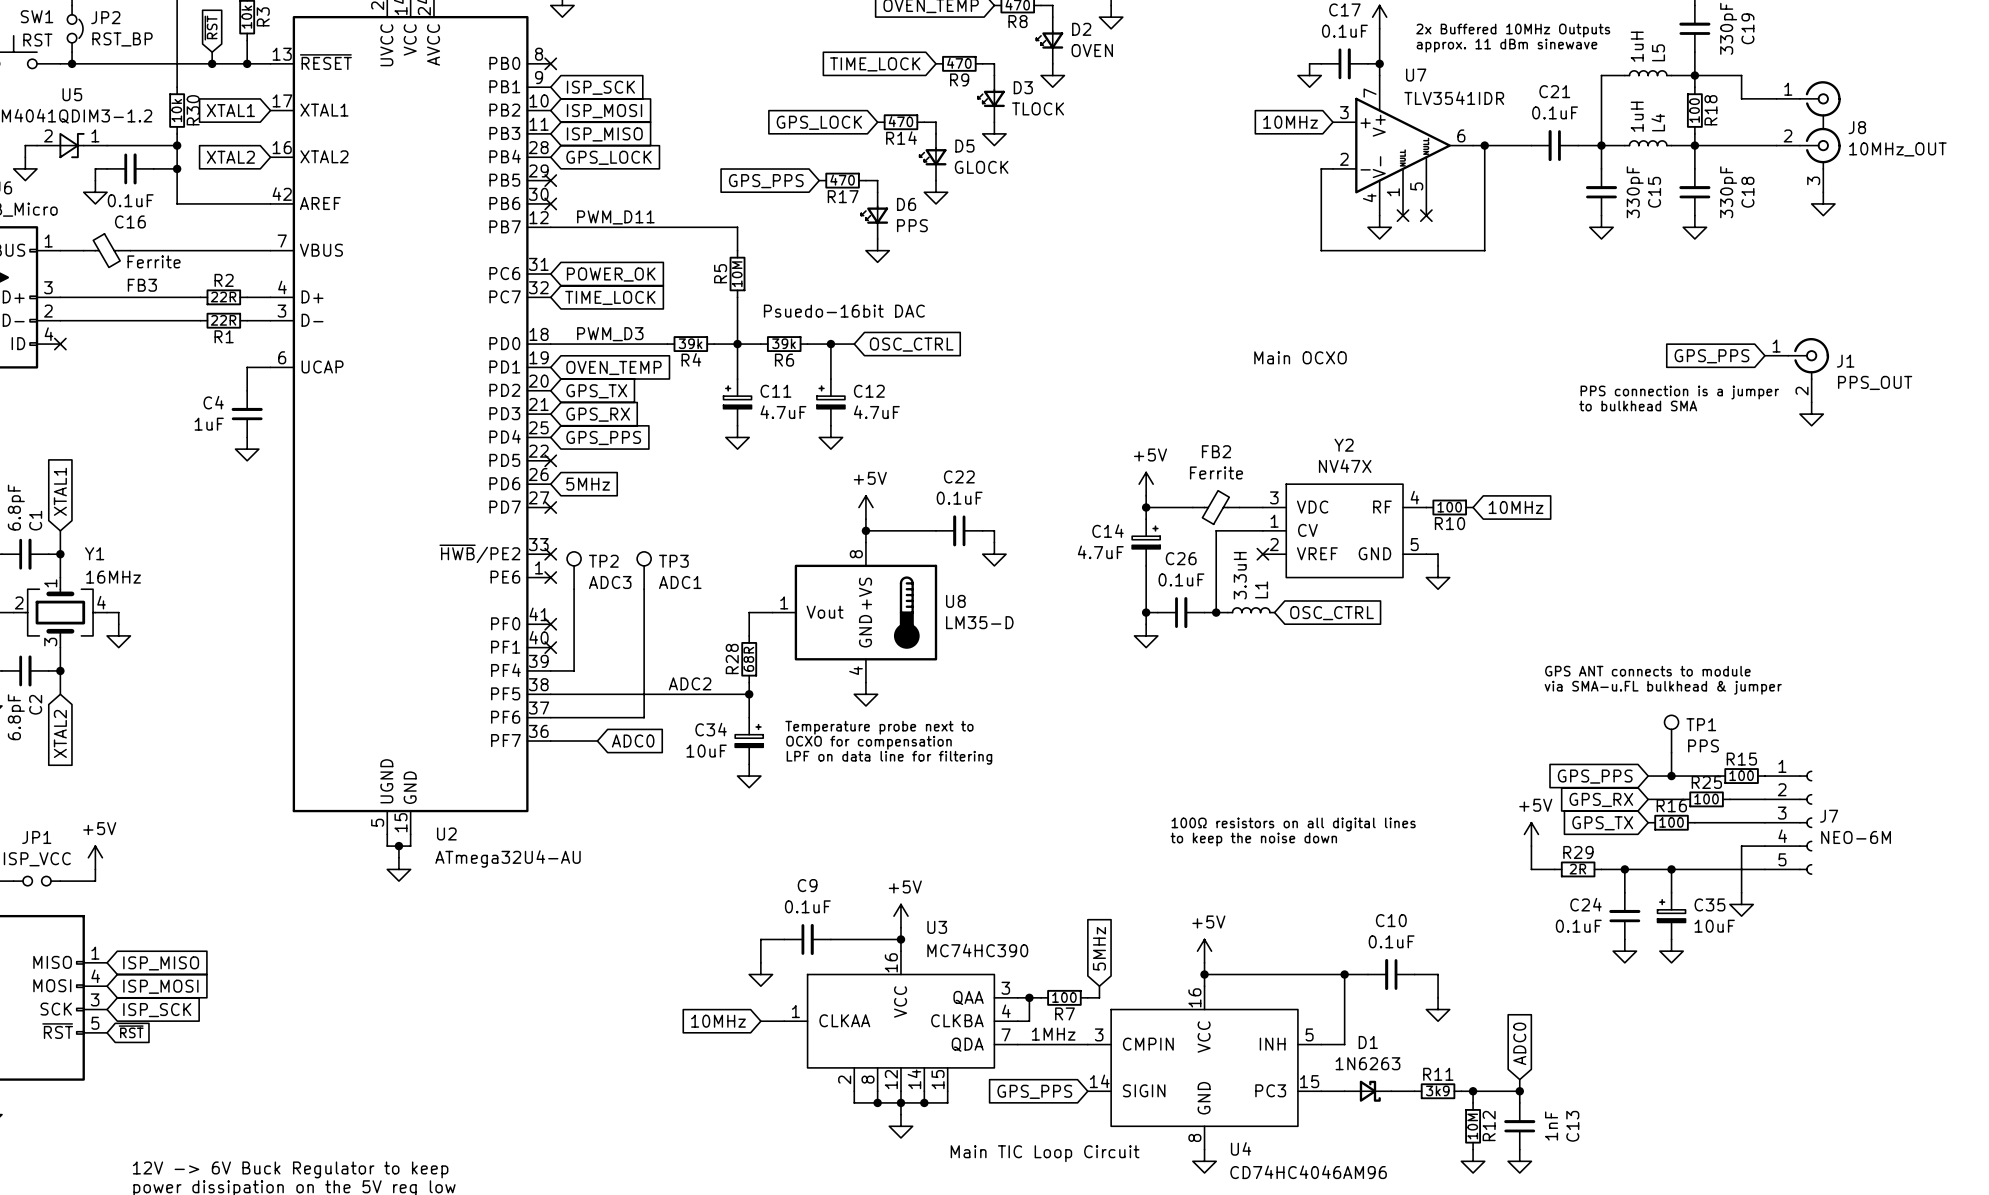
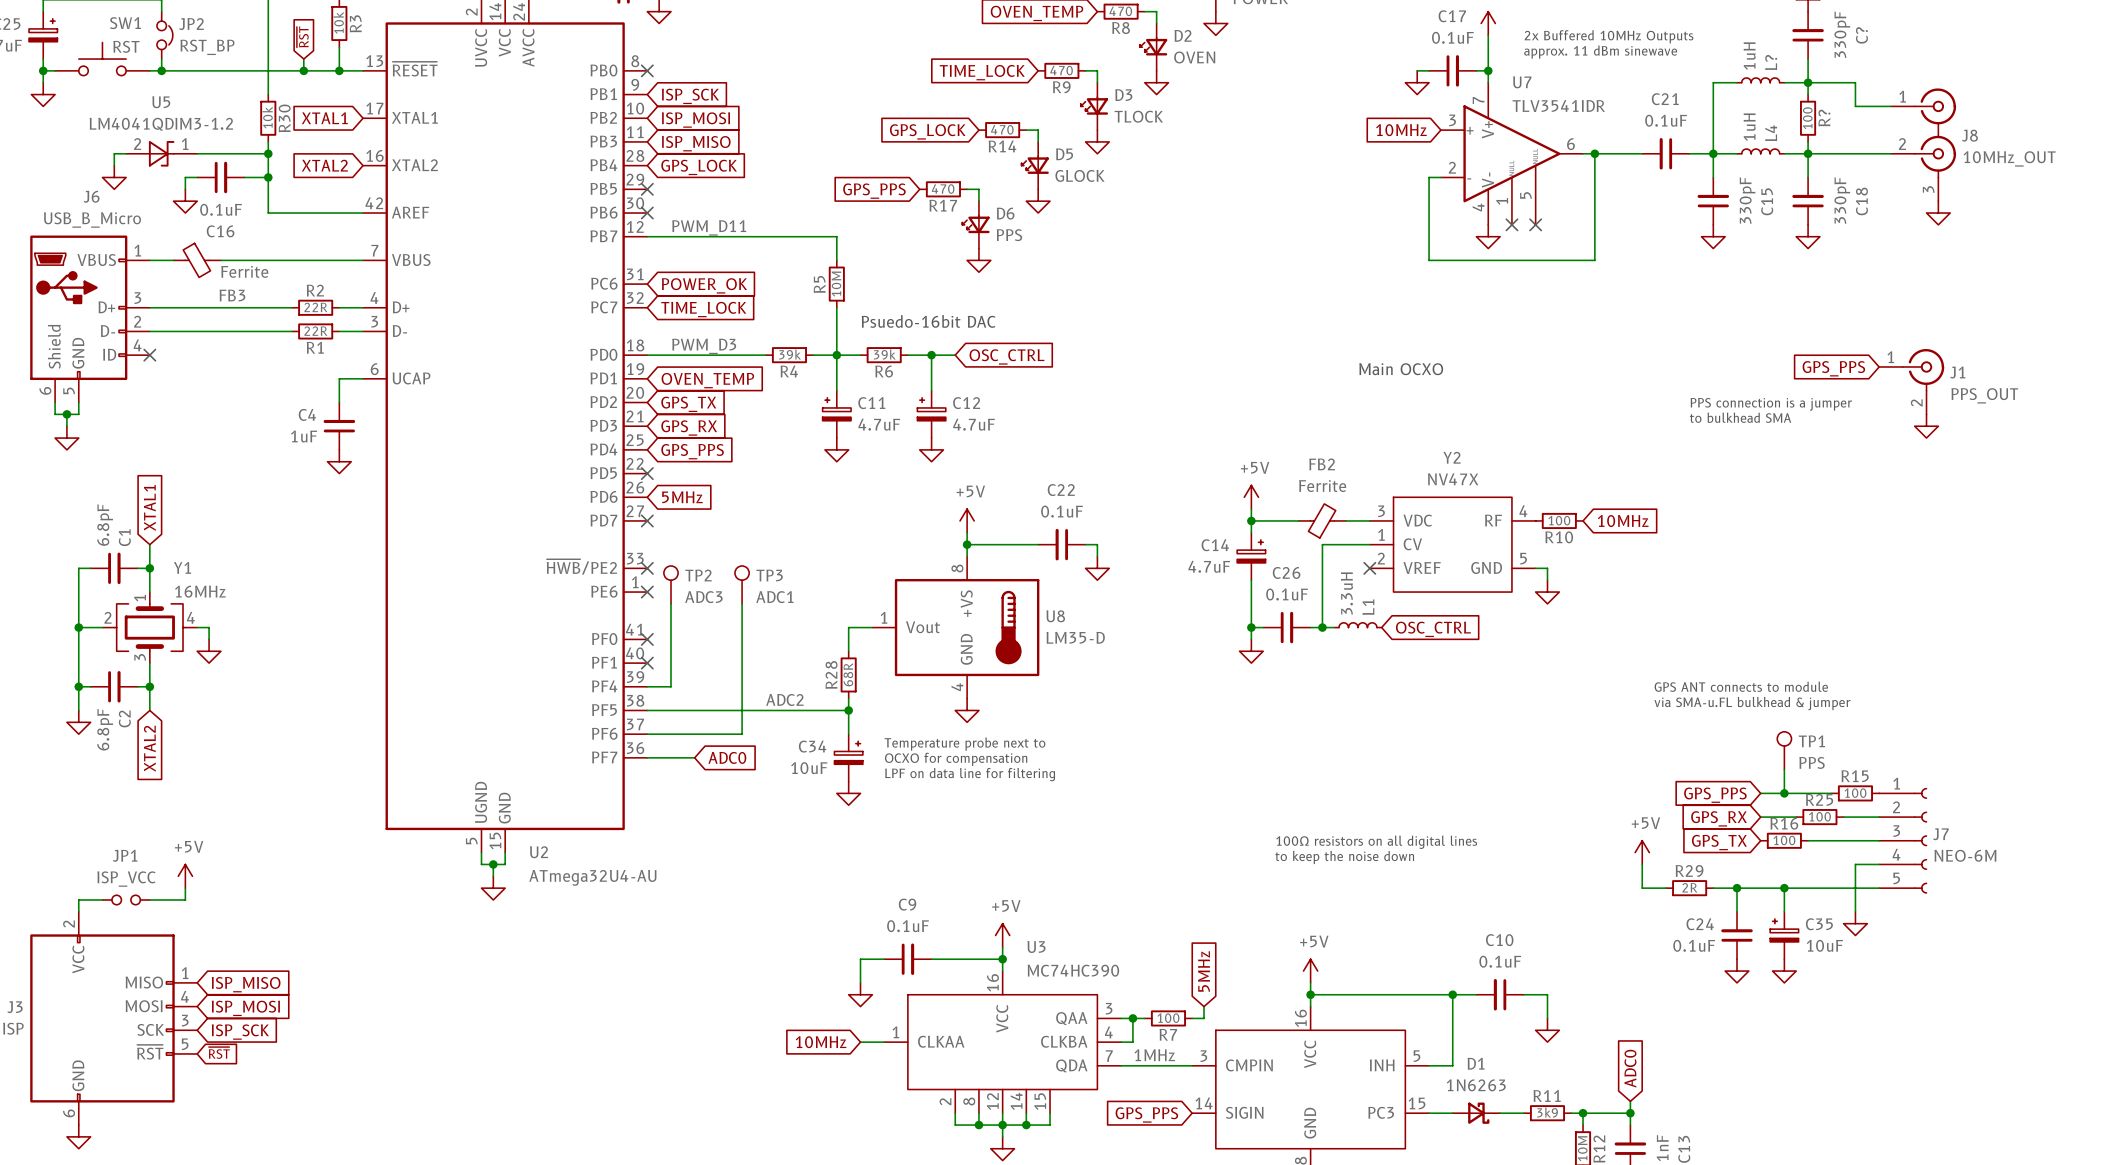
C19 name: C19 (1747, 28) -> C? (1861, 35)
L5 name: L5 (1658, 52) -> L? (1771, 62)
R18 name: R18 (1710, 110) -> R? (1824, 118)

